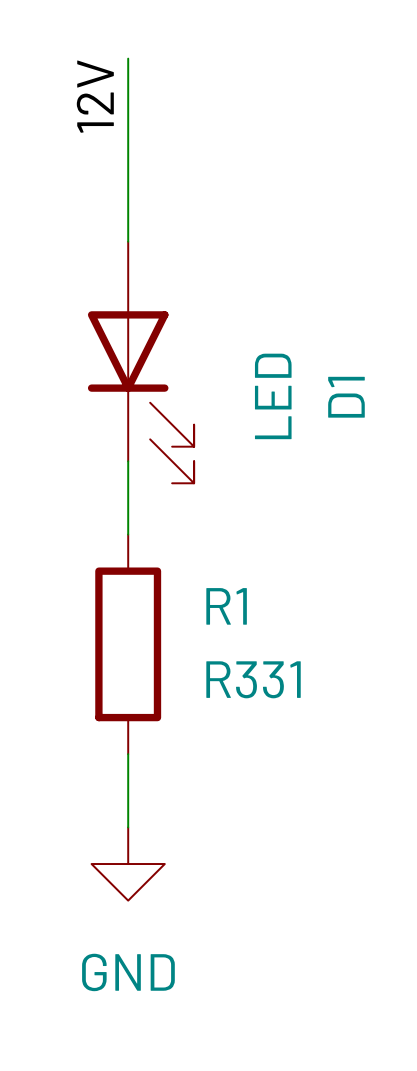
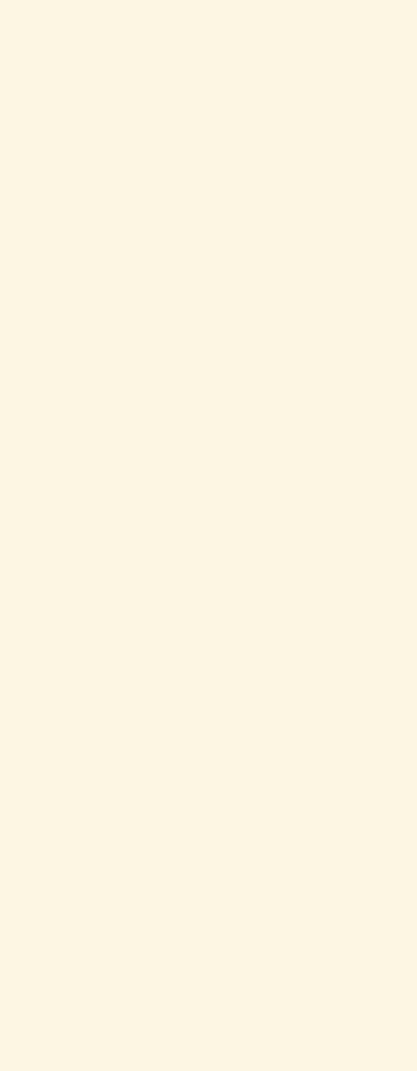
wire: (128, 58) (128, 241) -> none
label: 12V (95, 96) -> none
D1: LED (141, 362) -> none
wire: (128, 461) (128, 534) -> none
R1: R331 (128, 644) -> none
wire: (128, 754) (128, 827) -> none
power symbol: GND (128, 864) -> none

